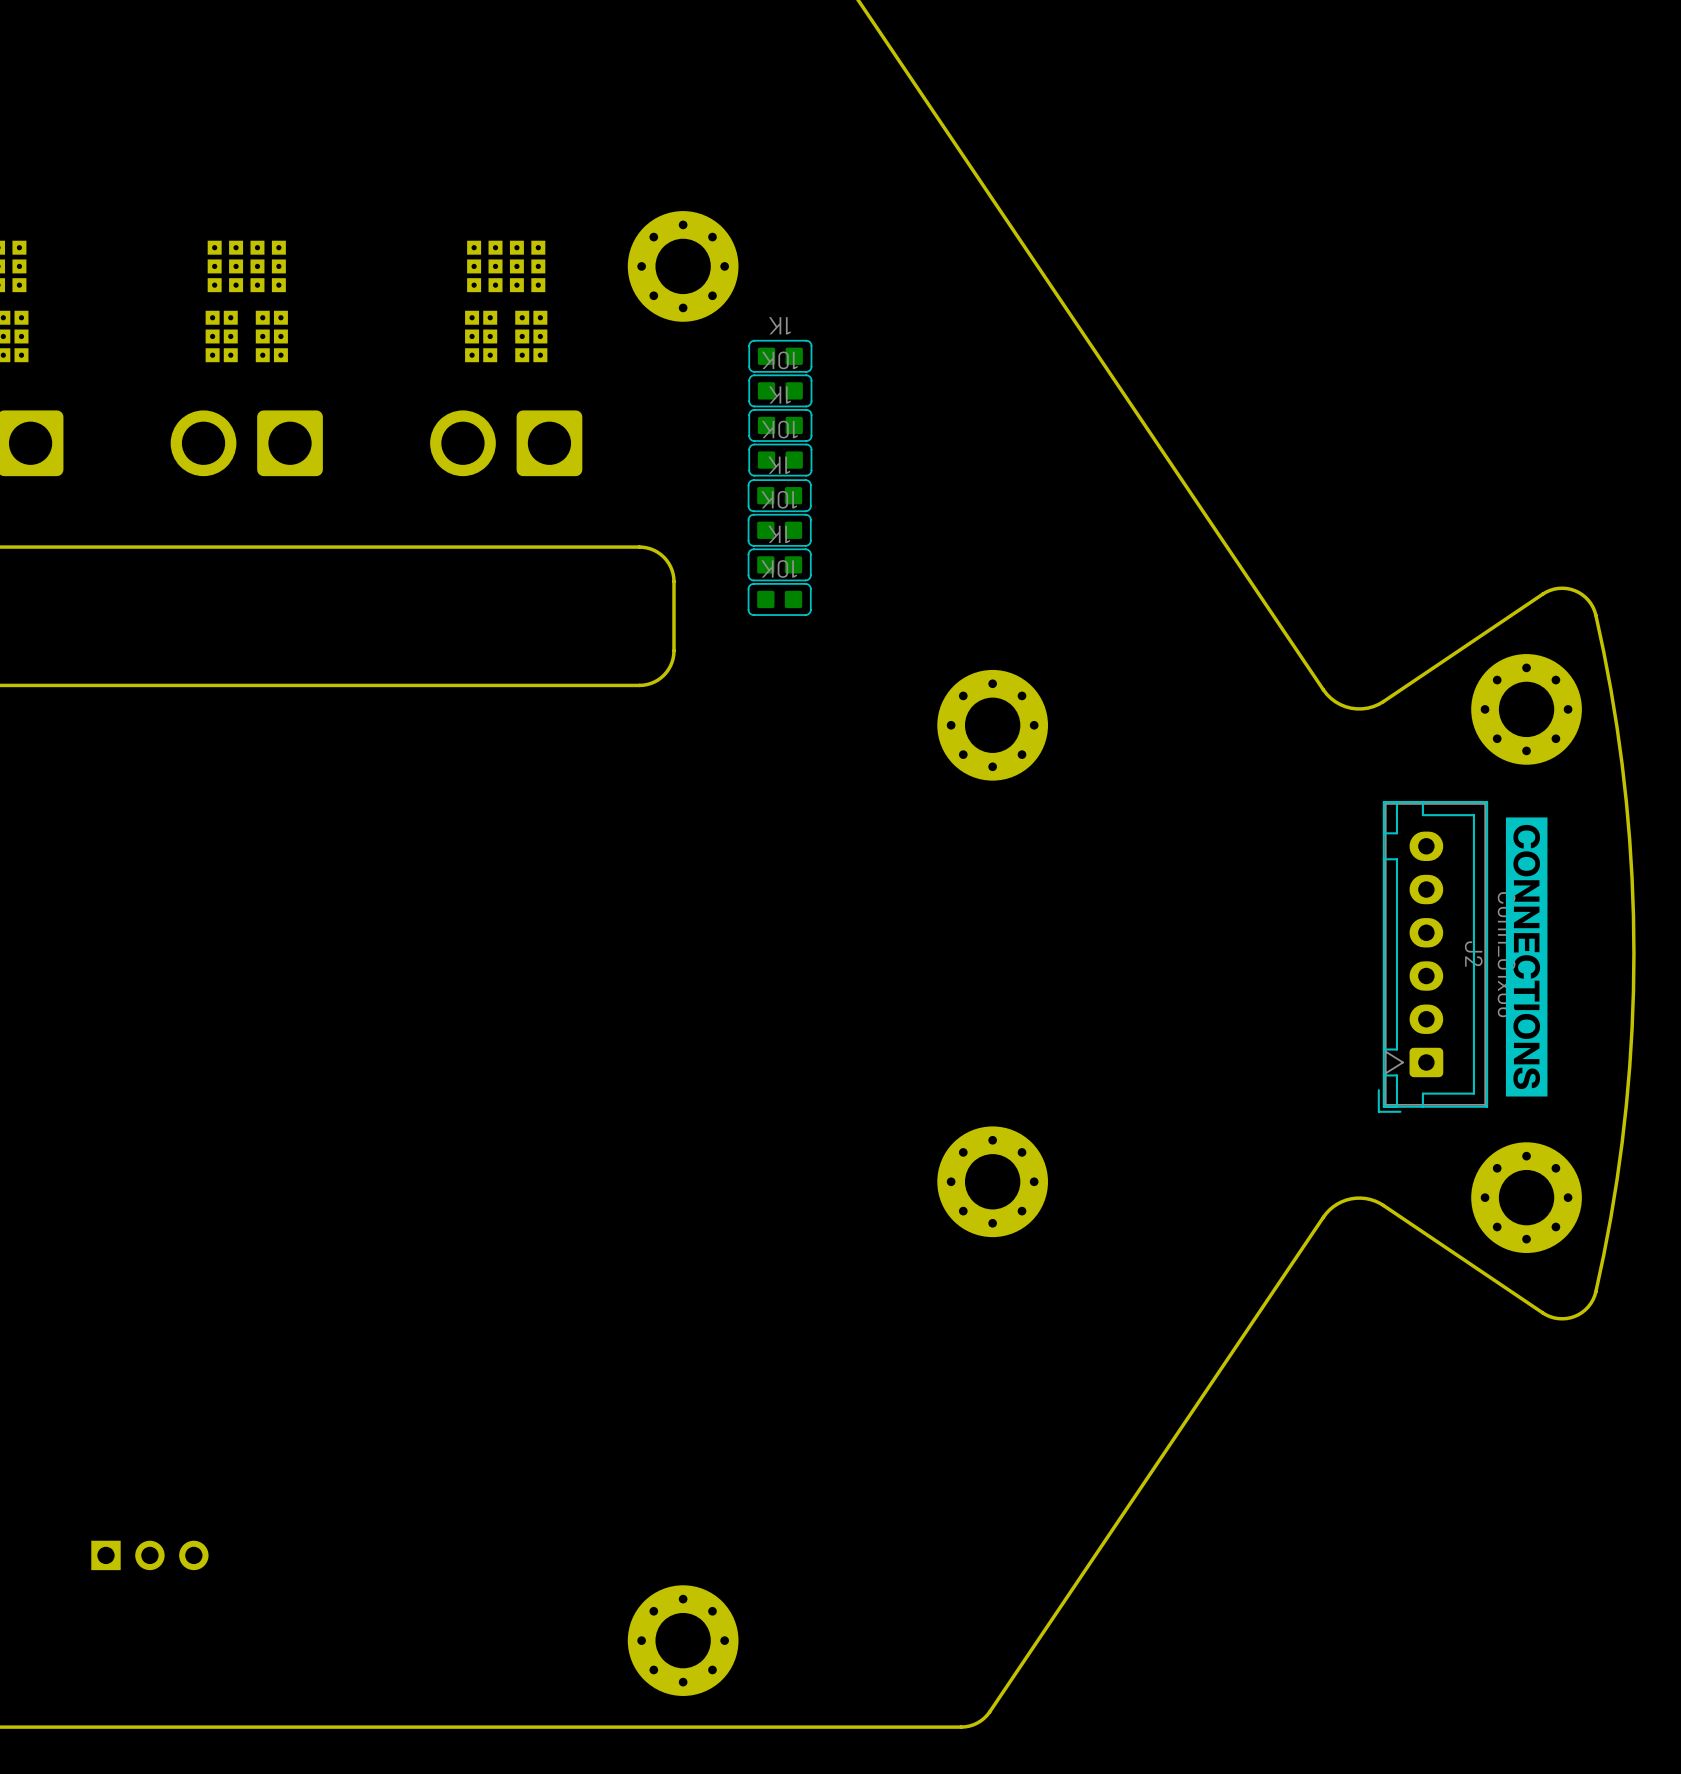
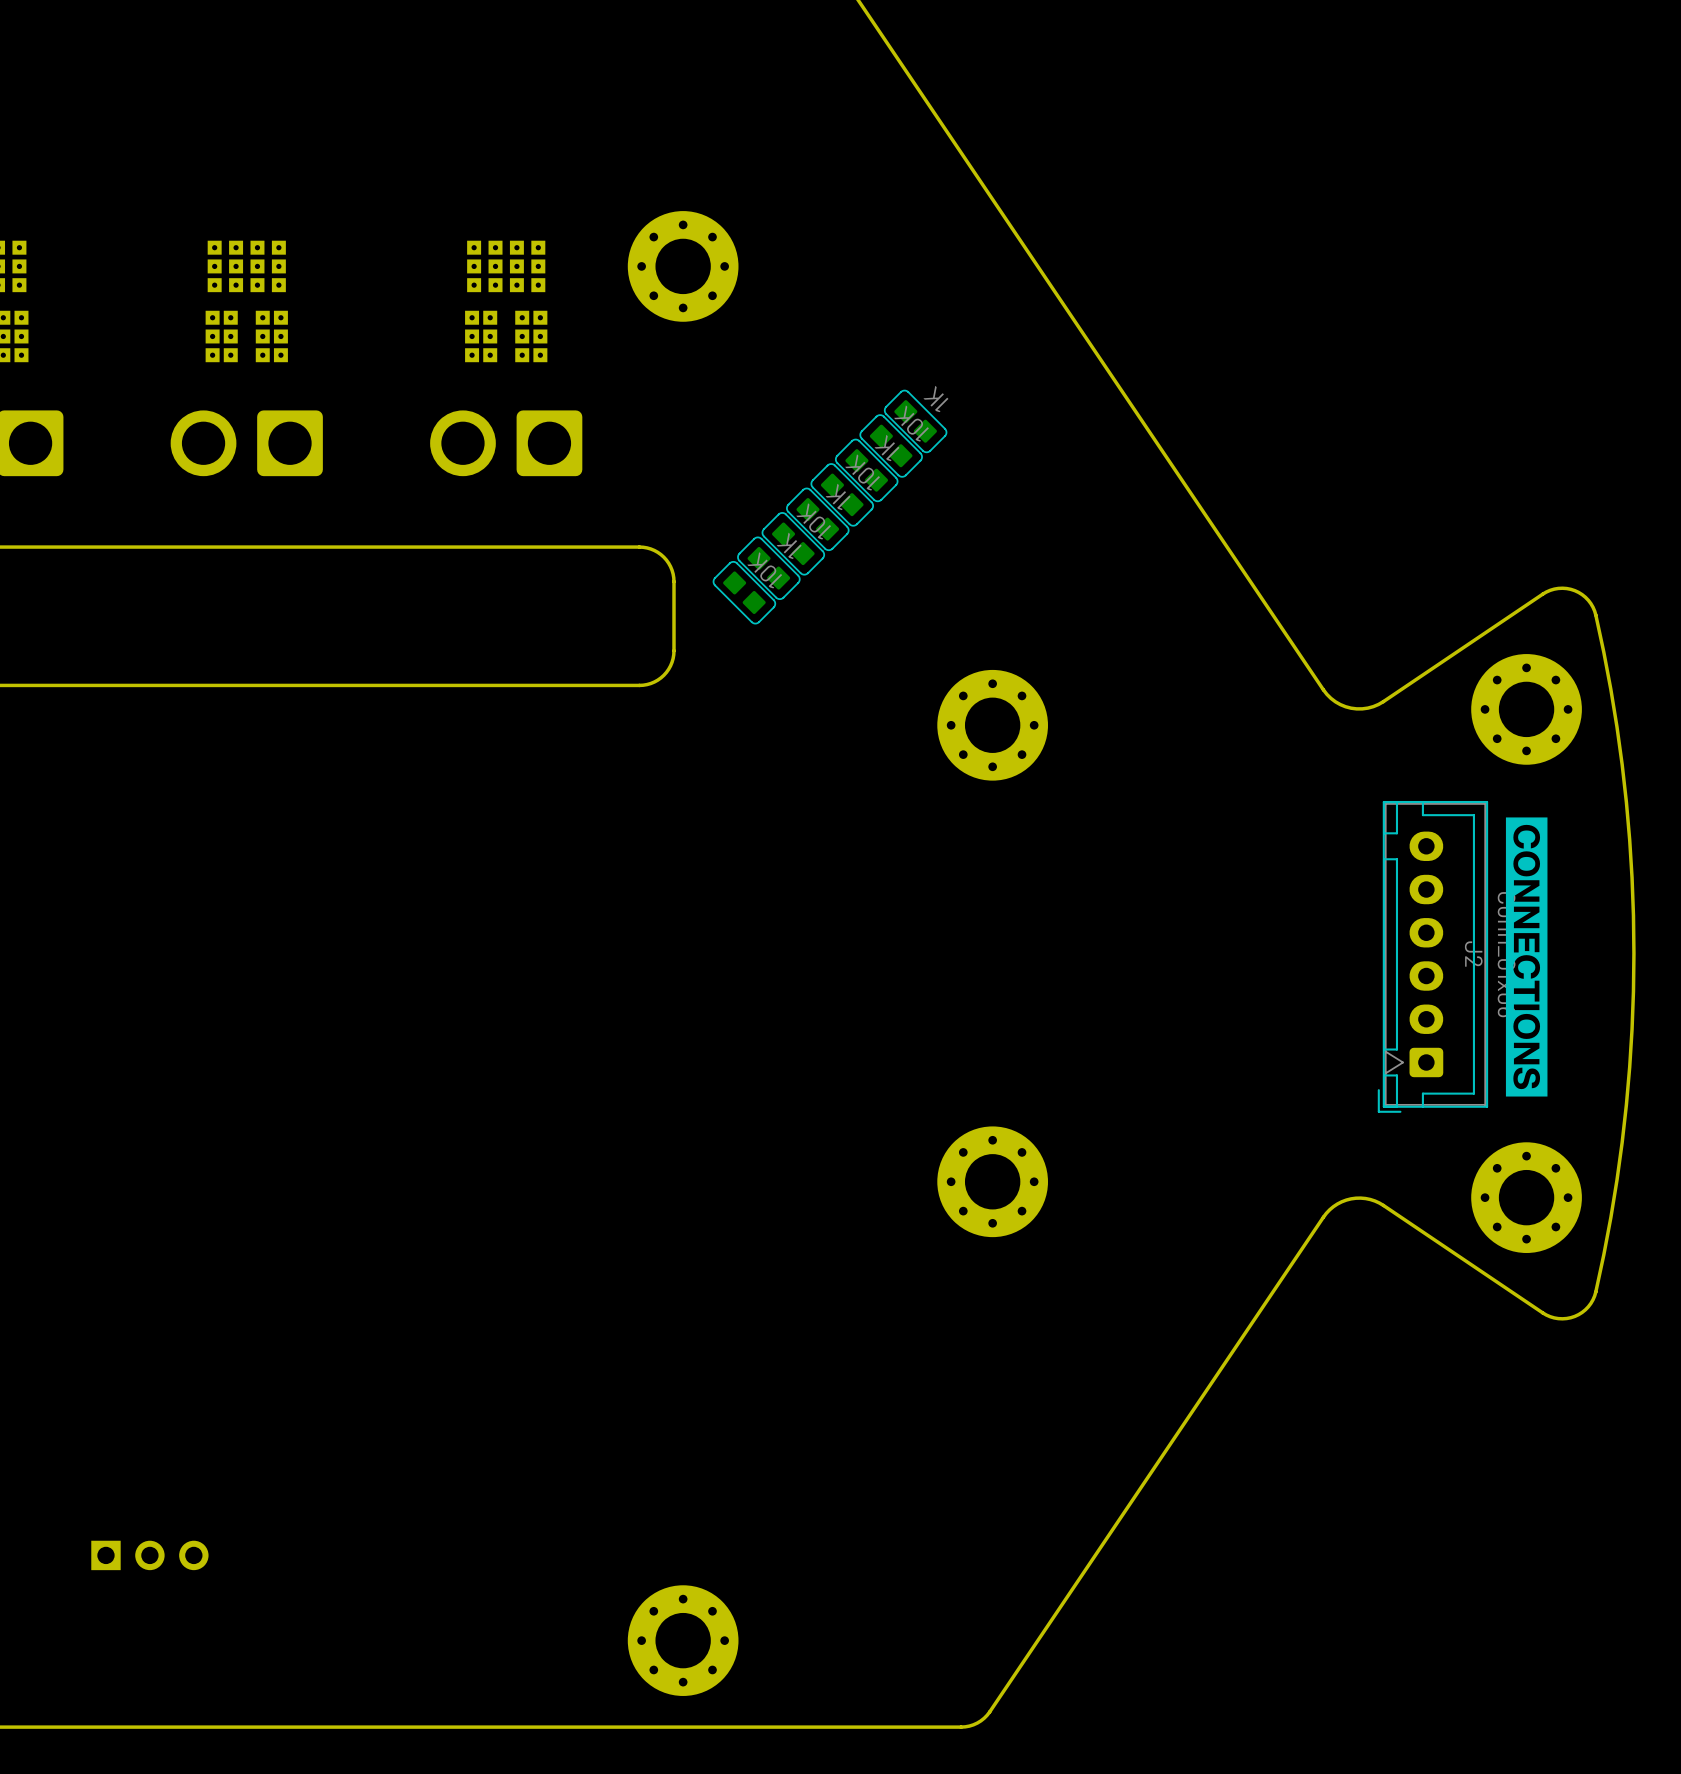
part: 1K (780, 356) -> none
part: 10K (780, 390) -> none
part: none -> 1K (915, 421)
part: 1K (780, 425) -> none
part: none -> 10K (891, 445)
part: 10K (780, 460) -> none
part: none -> 1K (866, 470)
part: none -> 10K (842, 494)
part: 1K (779, 495) -> none
part: none -> 1K (817, 519)
part: 10K (779, 530) -> none
part: none -> 10K (793, 543)
part rotation: 0° (779, 564) -> 45° clockwise (768, 568)
part: none -> 10K (744, 592)
part: 10K (779, 599) -> none

